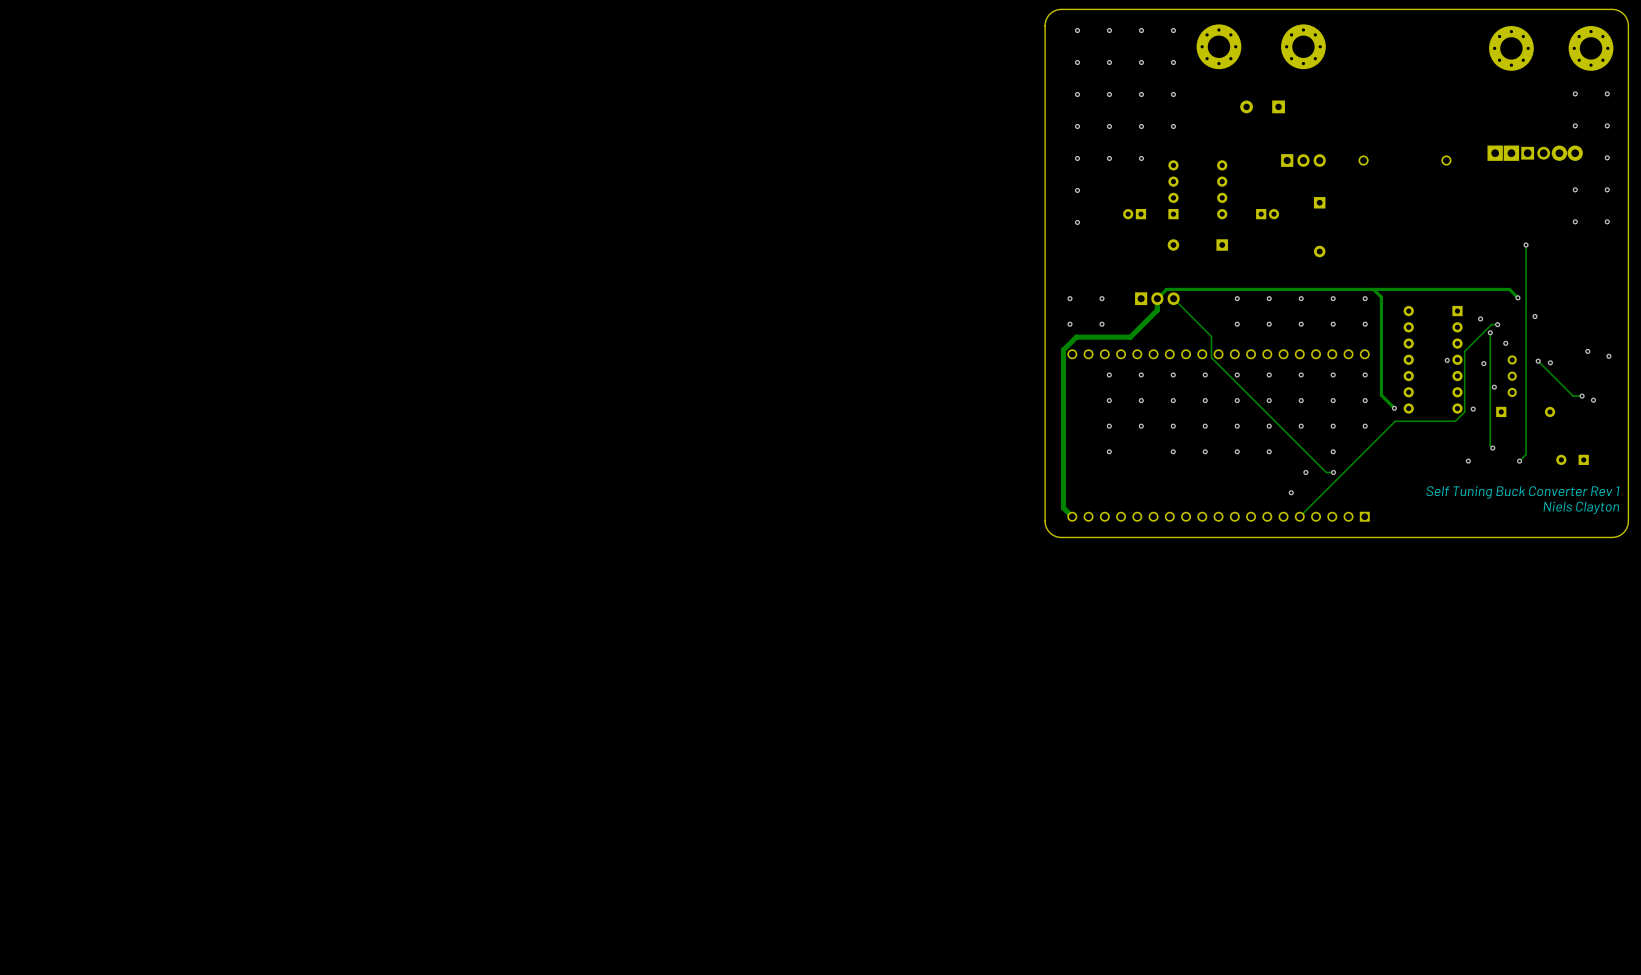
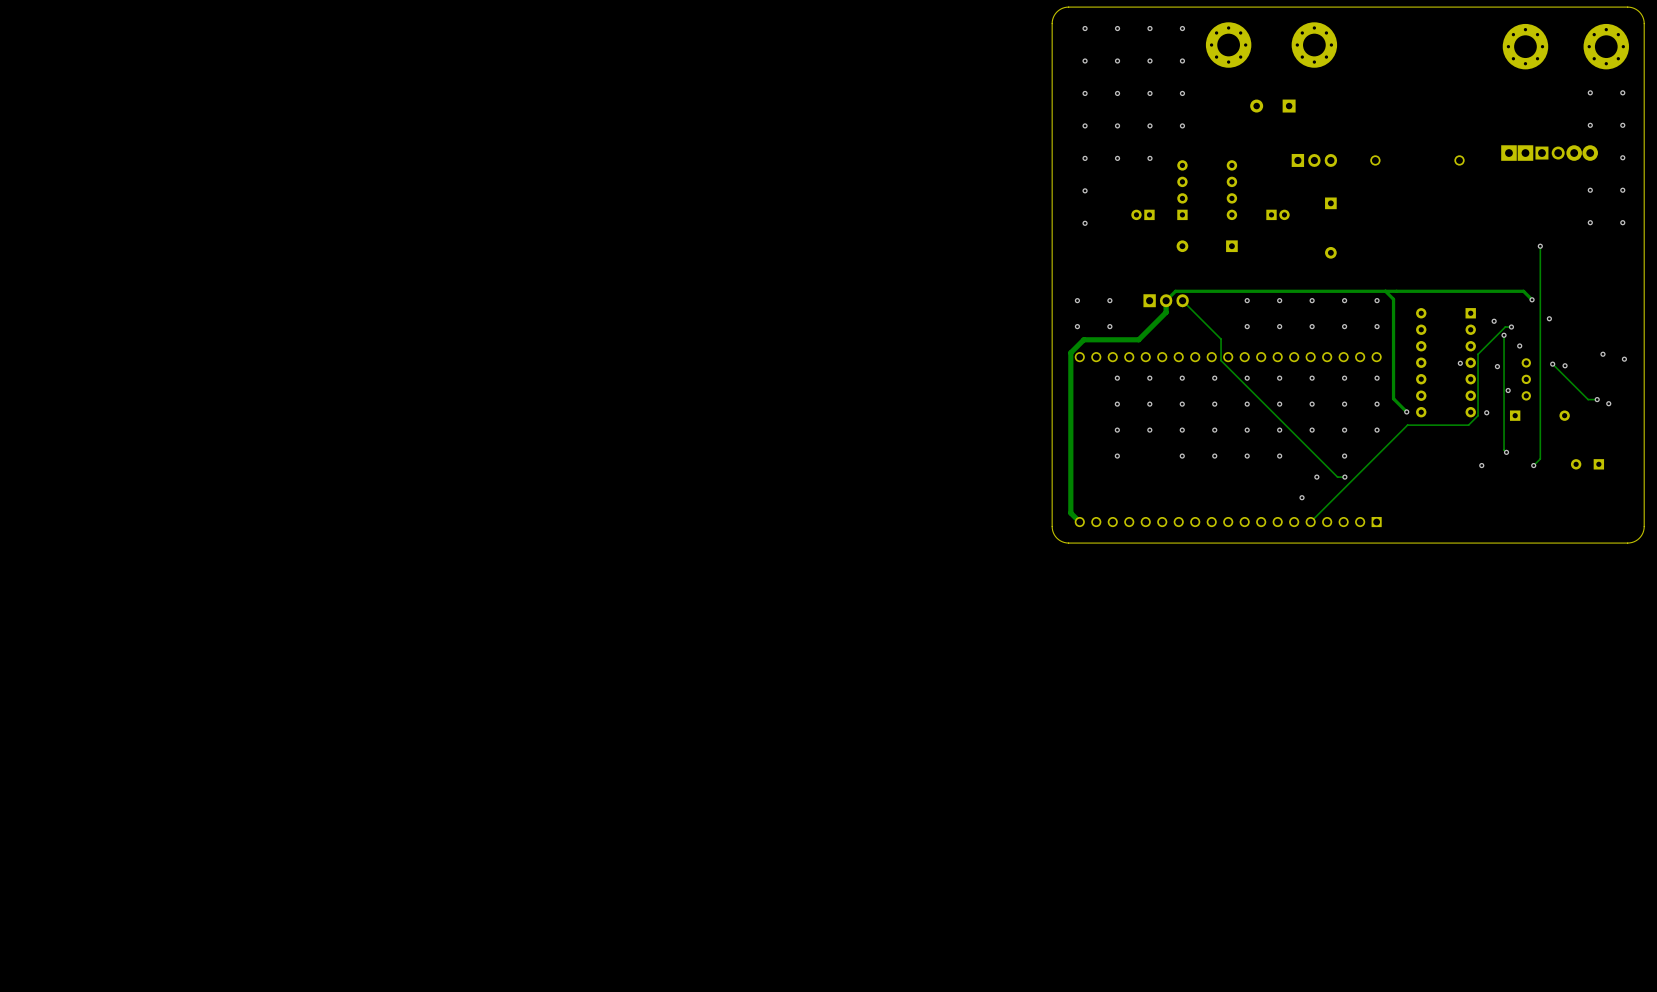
text: Self Tuning Buck Converter Rev 1 (1522, 492) -> none
text: Niels Clayton (1581, 507) -> none

